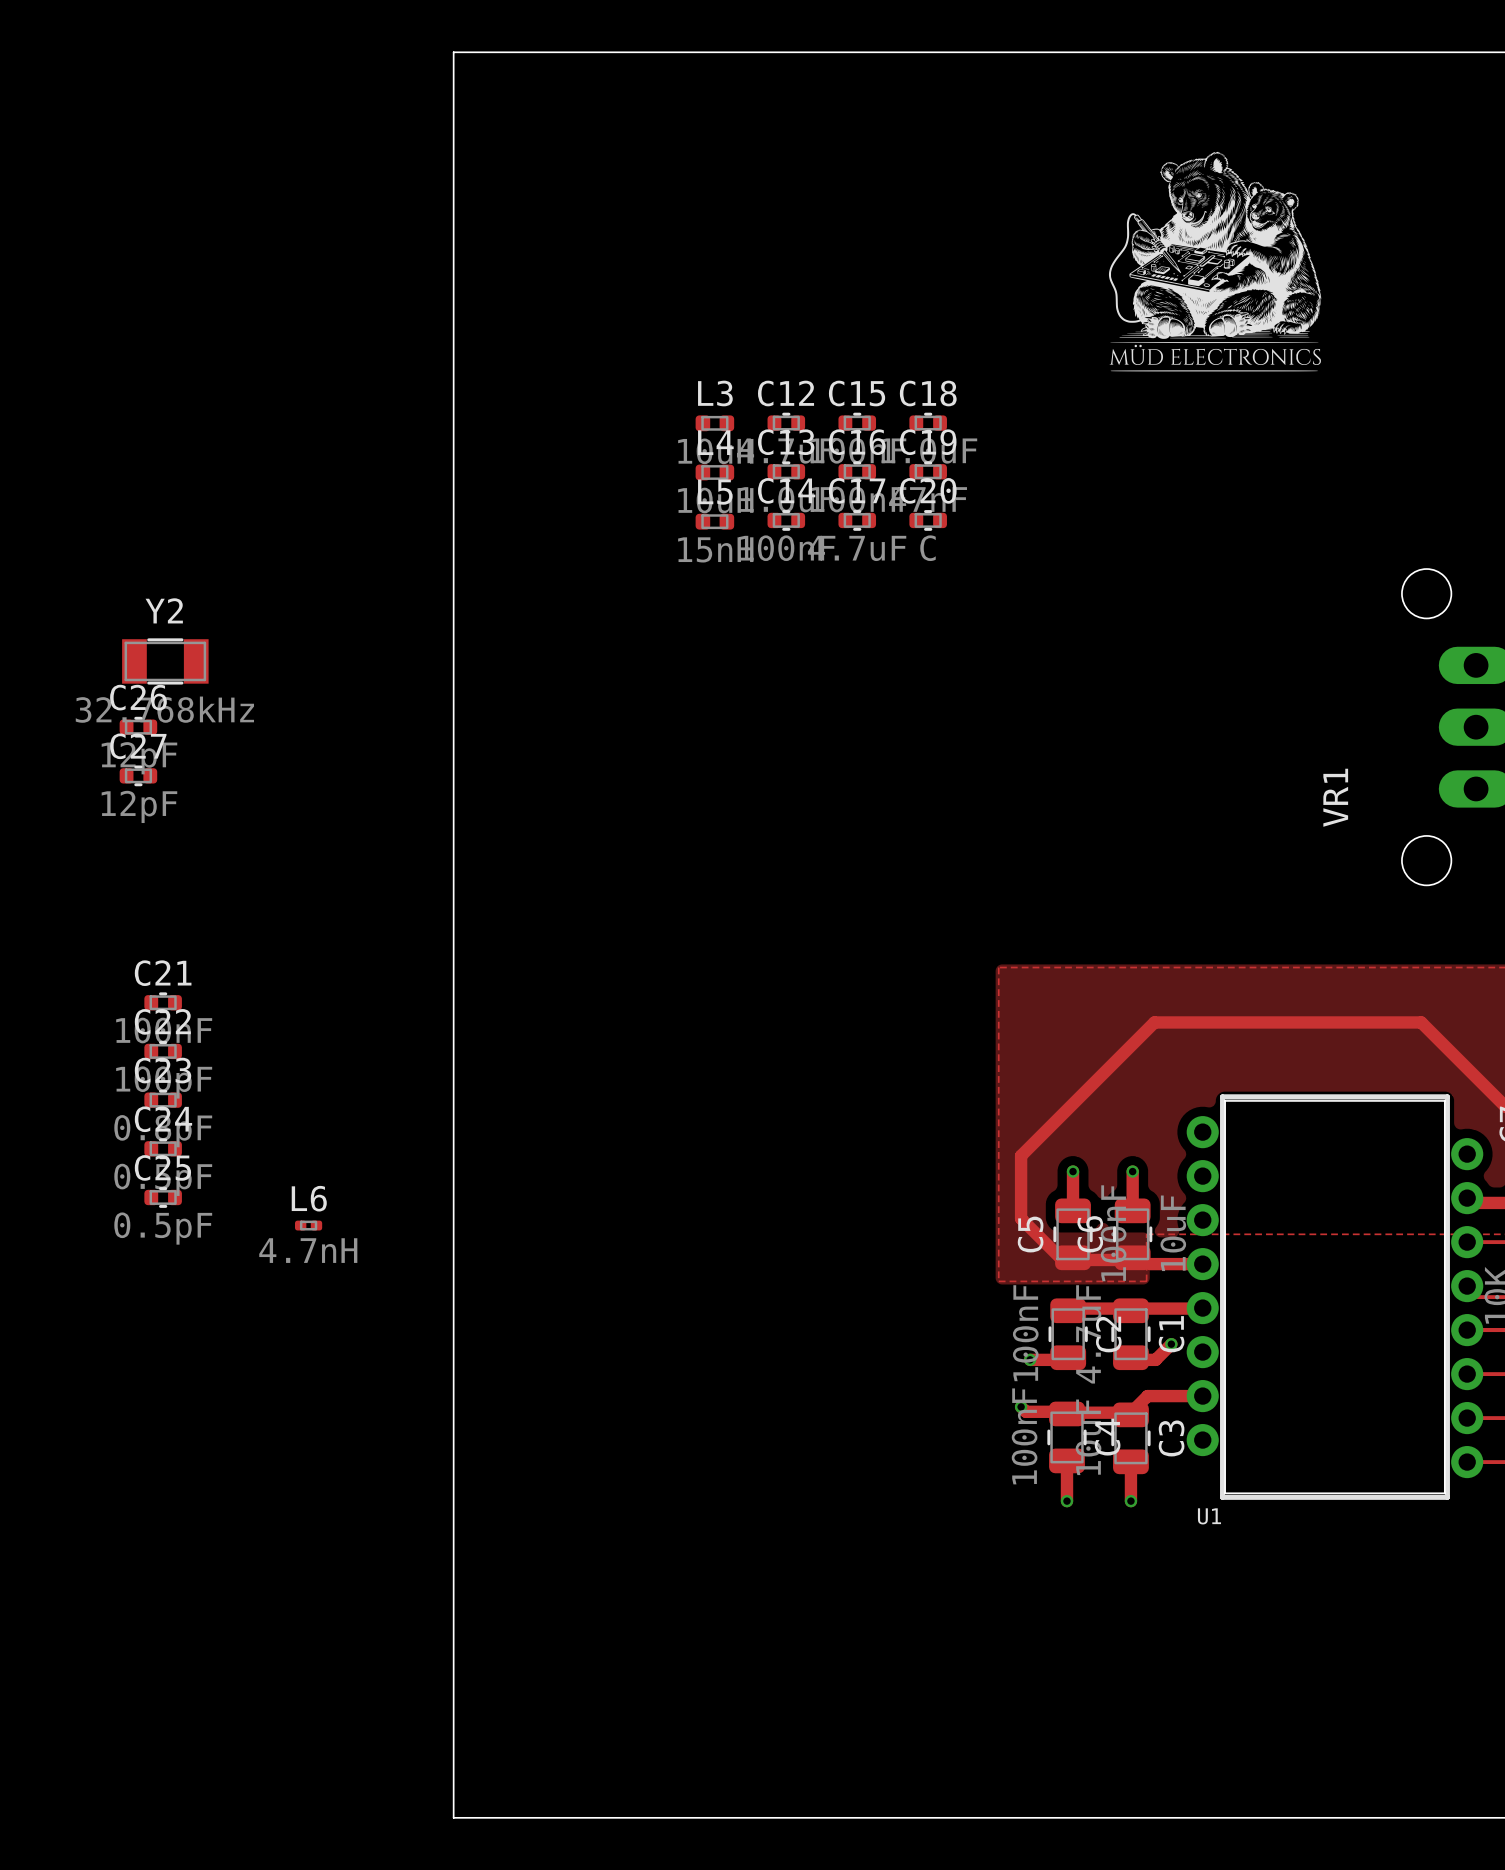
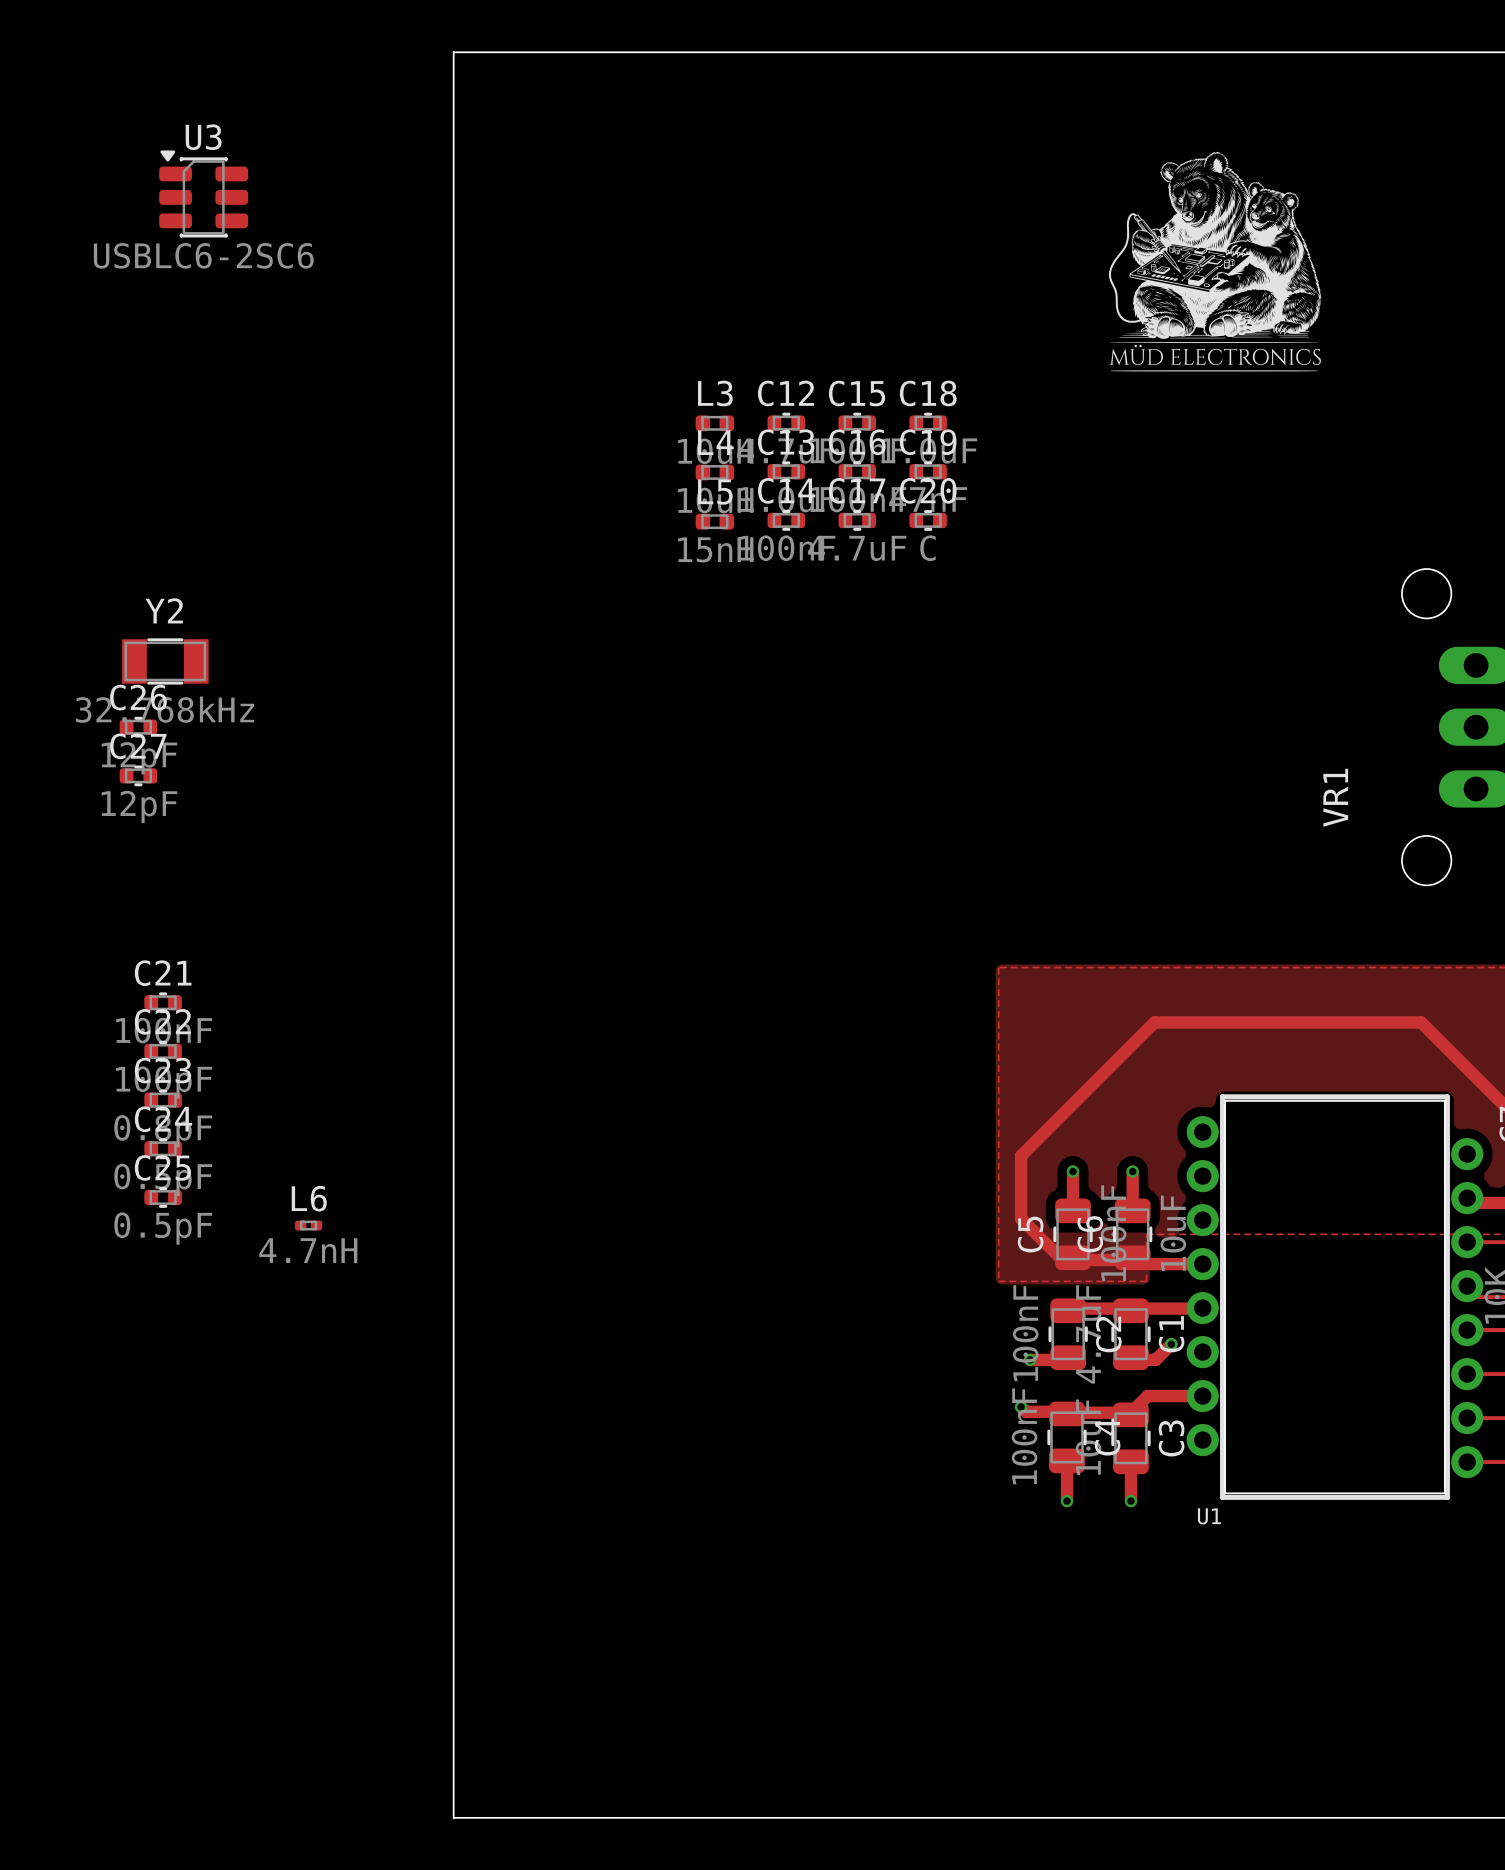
U3: none -> USBLC6-2SC6 (203, 193)

